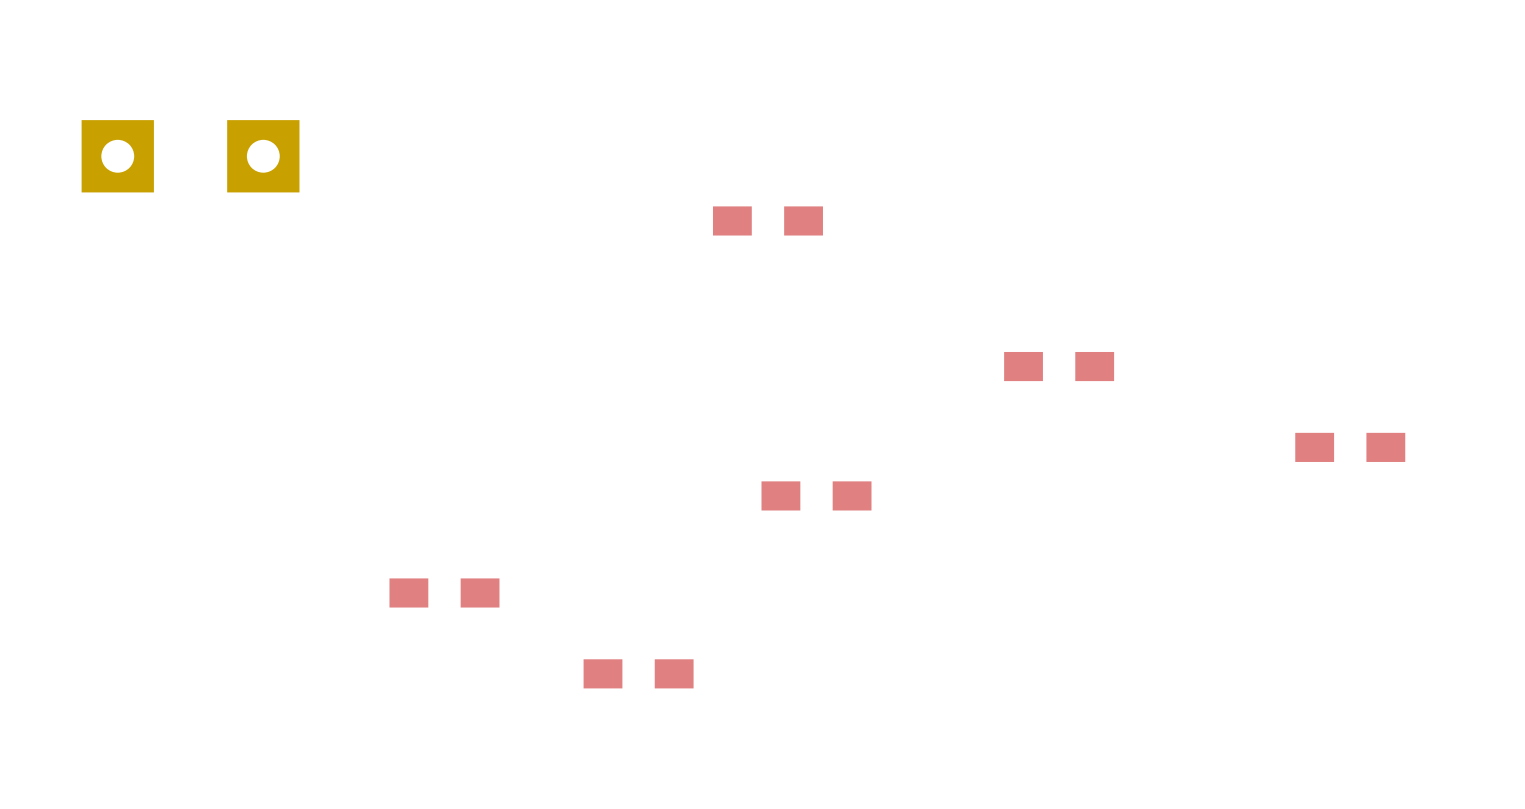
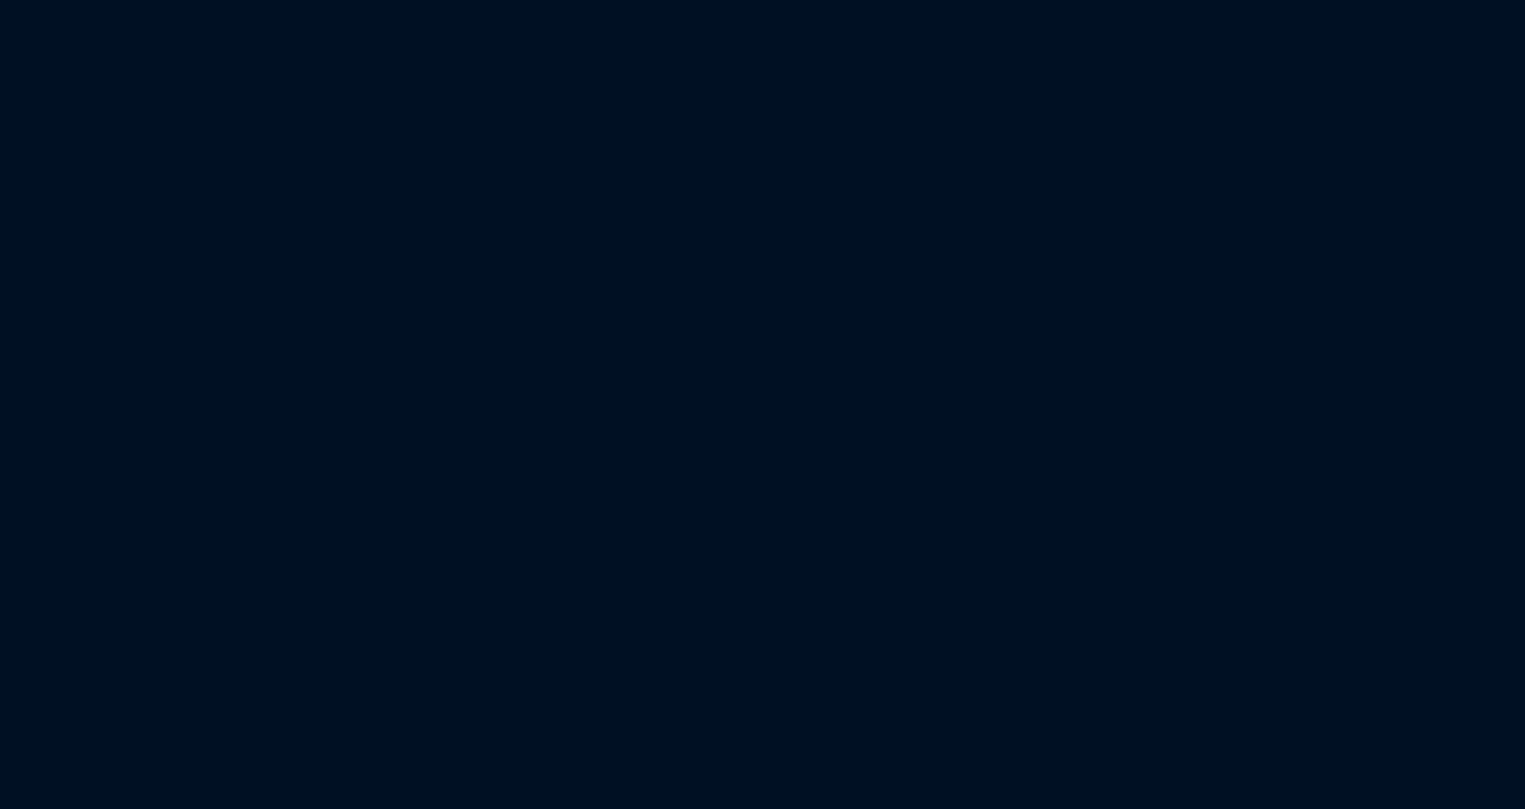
part: (117, 156) -> none
part: (263, 156) -> none
part: (767, 220) -> none
part: (1059, 366) -> none
part: (1350, 447) -> none
part: (816, 495) -> none
part: (444, 592) -> none
part: (638, 673) -> none

